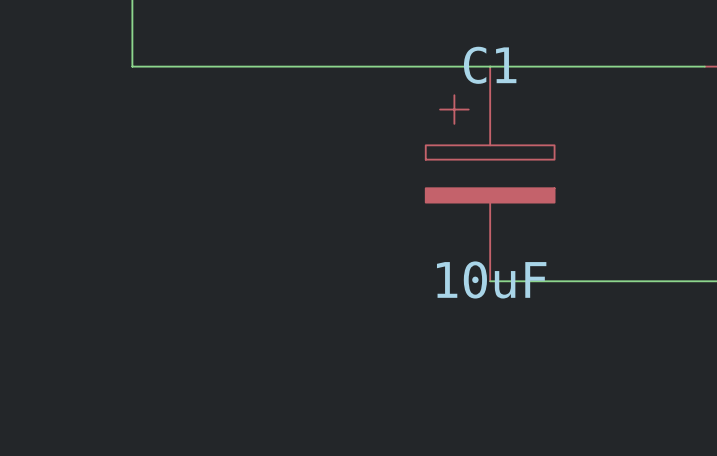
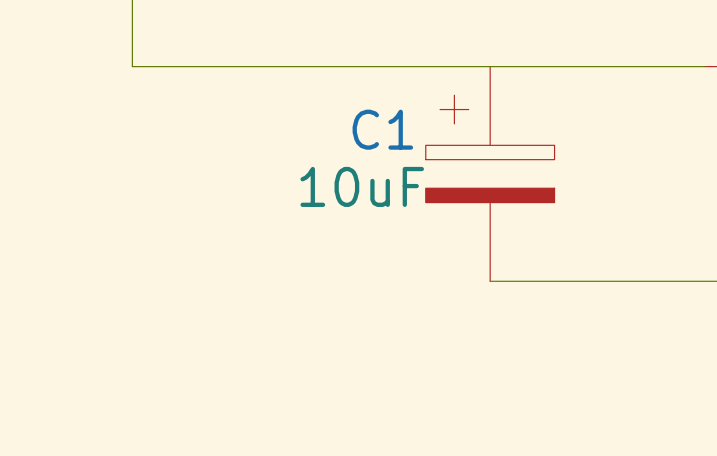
C1 name position: C1 (490, 65) -> C1 (382, 129)
C1 value position: 10uF (491, 279) -> 10uF (362, 186)

